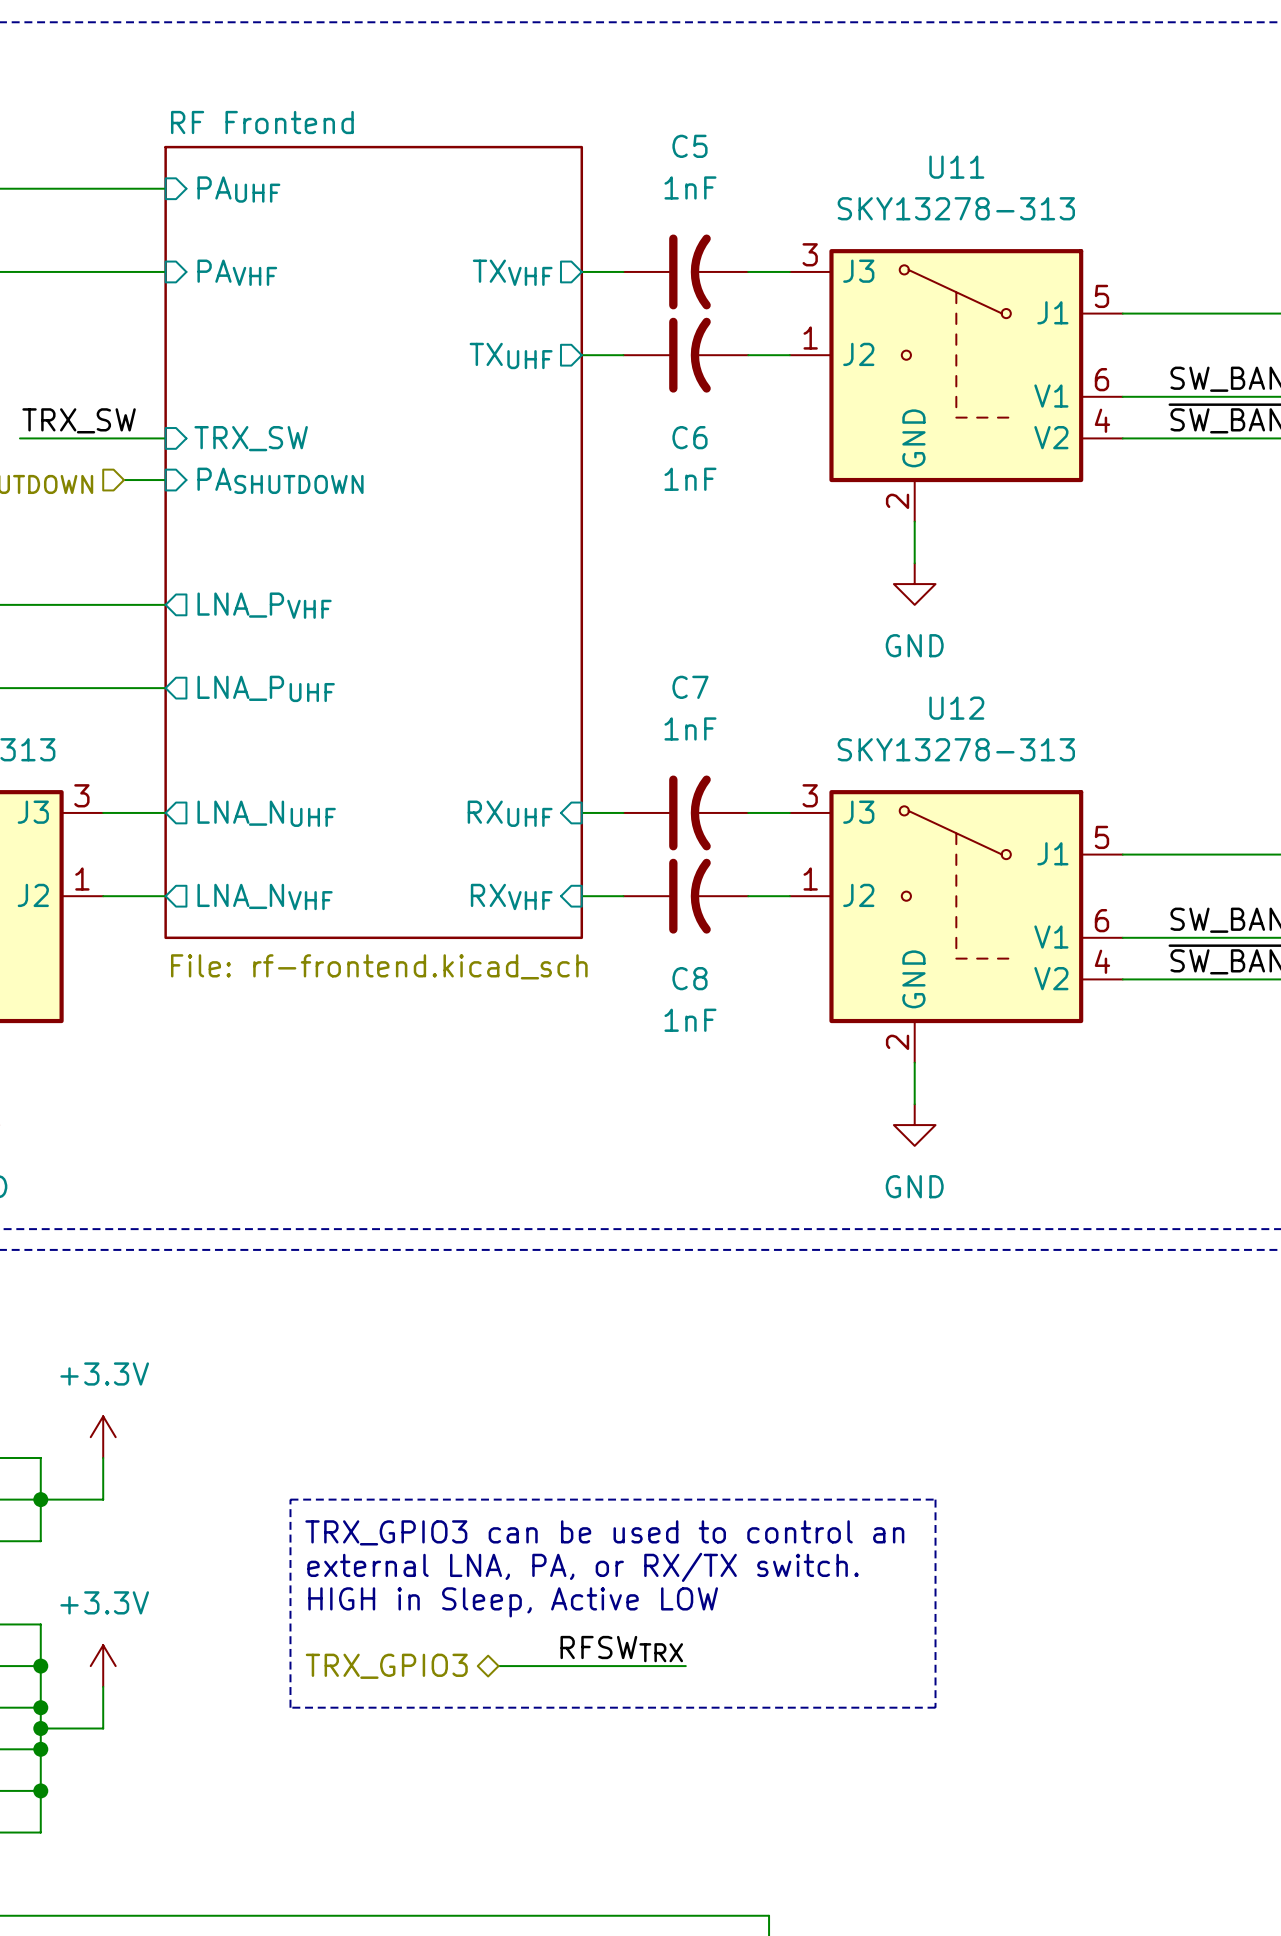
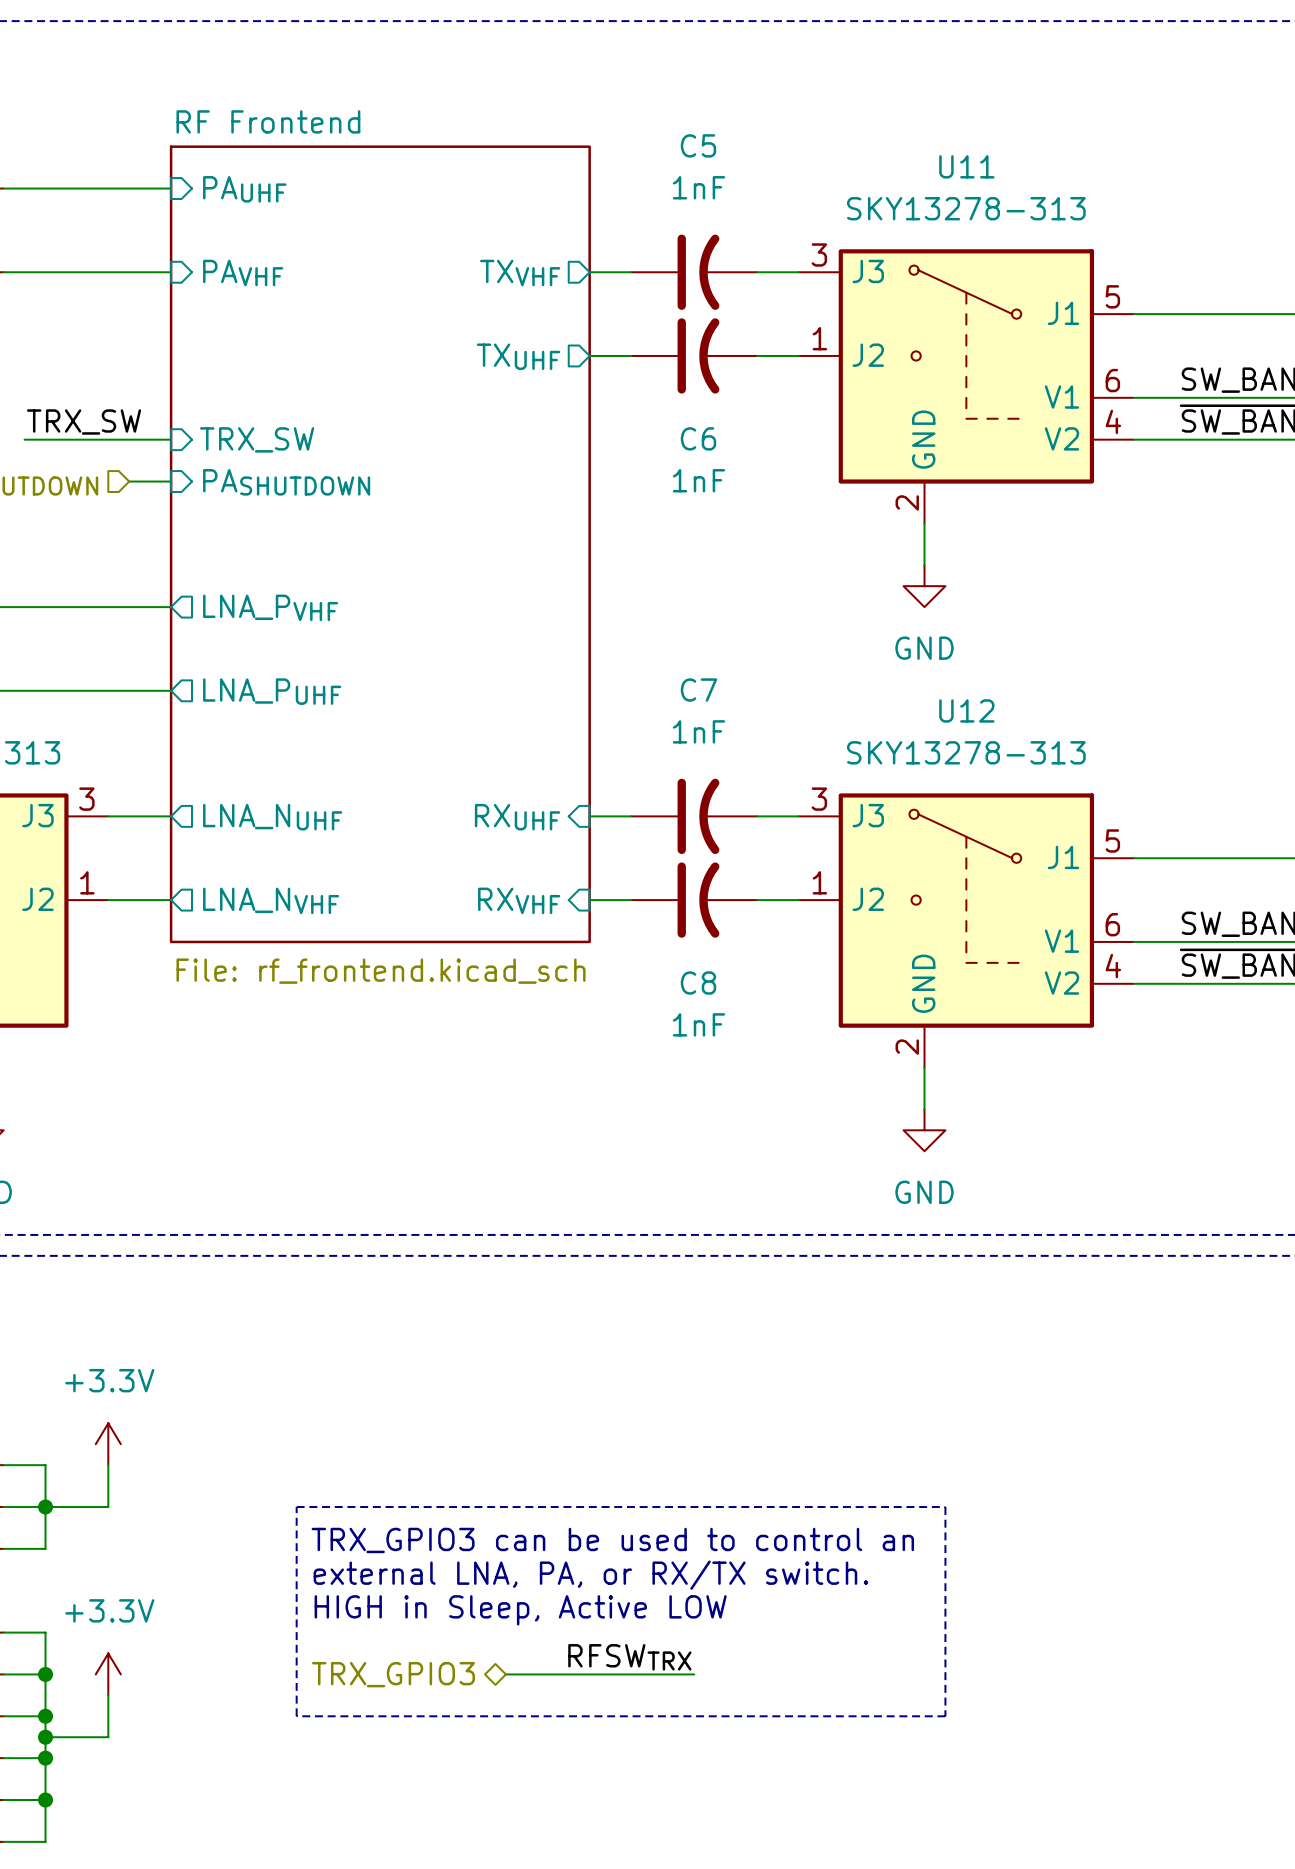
sheet RF Frontend value: File: rf-frontend.kicad_sch (379, 966) -> File: rf_frontend.kicad_sch (381, 971)

